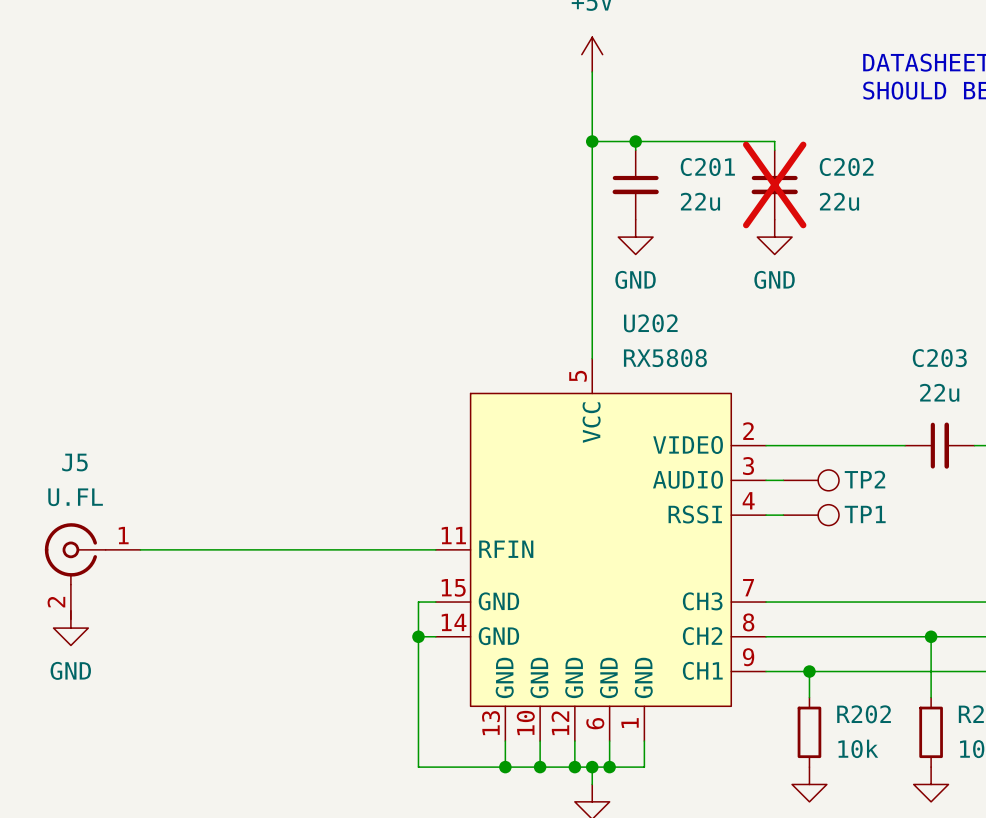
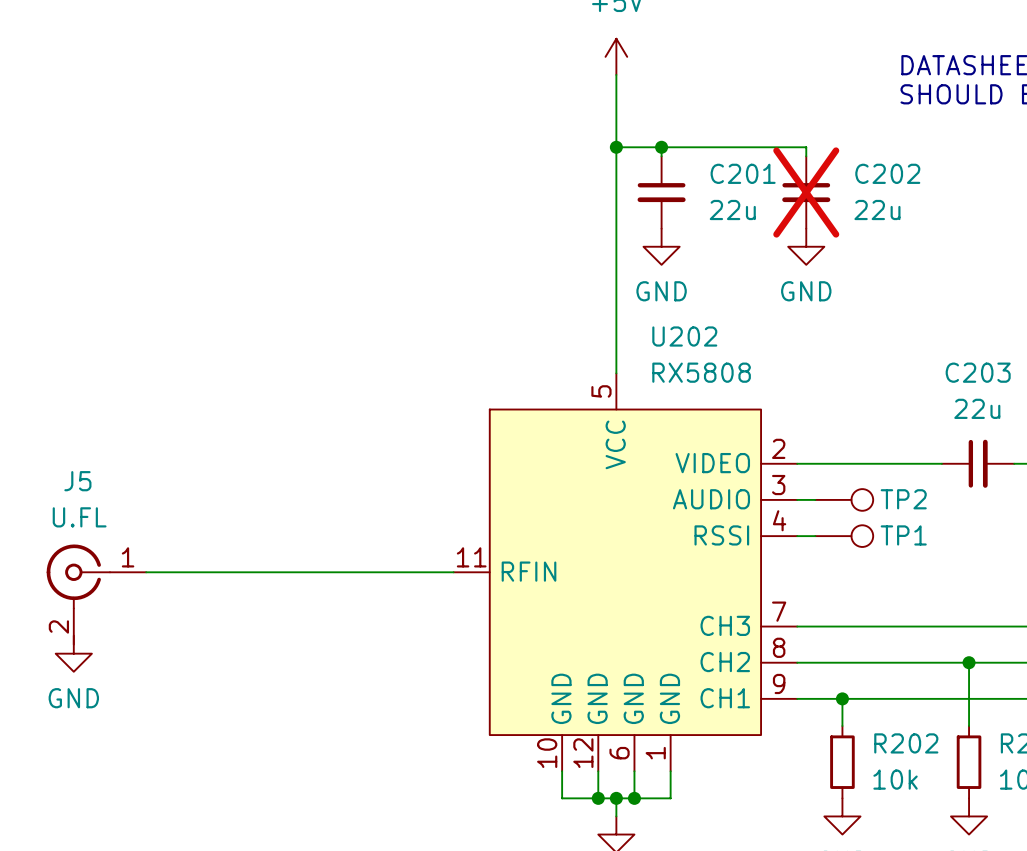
U202 symbol: [435, 358, 767, 742] -> [453, 373, 798, 772]
wire: (435, 602) (418, 602) (418, 767) (540, 767) -> none
wire: (418, 636) (435, 636) -> none
junction: (418, 636) -> none
wire: (505, 741) (505, 767) -> none
junction: (505, 767) -> none
junction: (540, 767) -> none

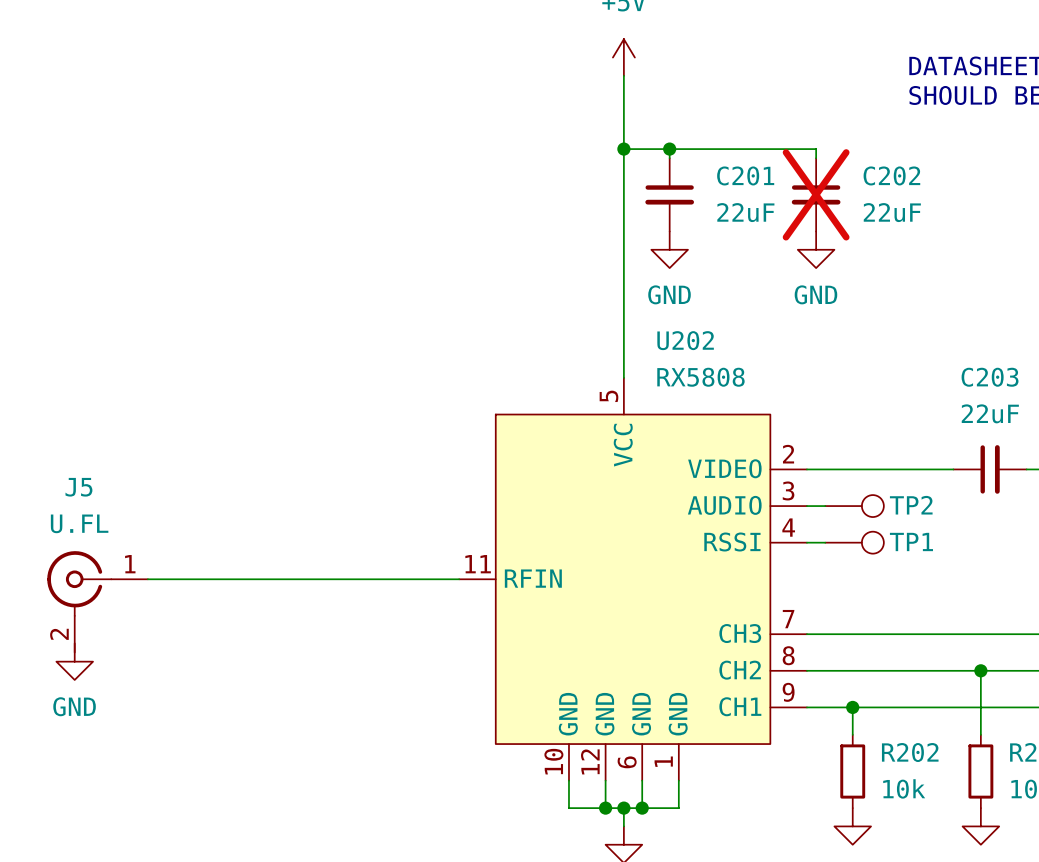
C201 value: 22u (732, 209) -> 22uF (745, 212)
C202 value: 22u (877, 209) -> 22uF (892, 212)
C203 value: 22u (977, 408) -> 22uF (990, 413)

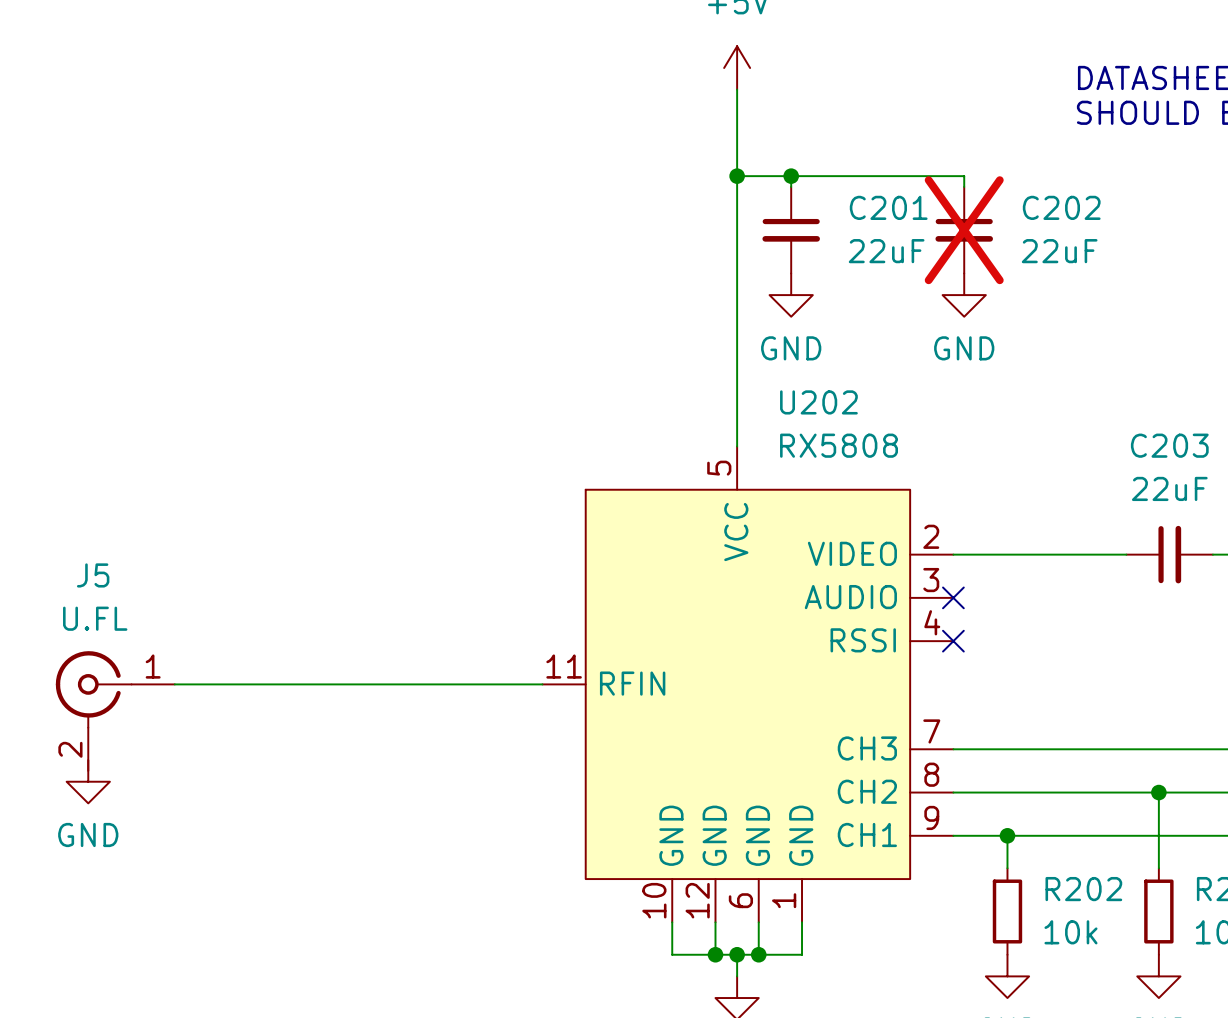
wire: (806, 506) (825, 506) -> none
no-connect mark: none -> (953, 597)
TP2: (854, 506) -> none
wire: (806, 542) (825, 542) -> none
no-connect mark: none -> (953, 641)
TP1: (854, 542) -> none

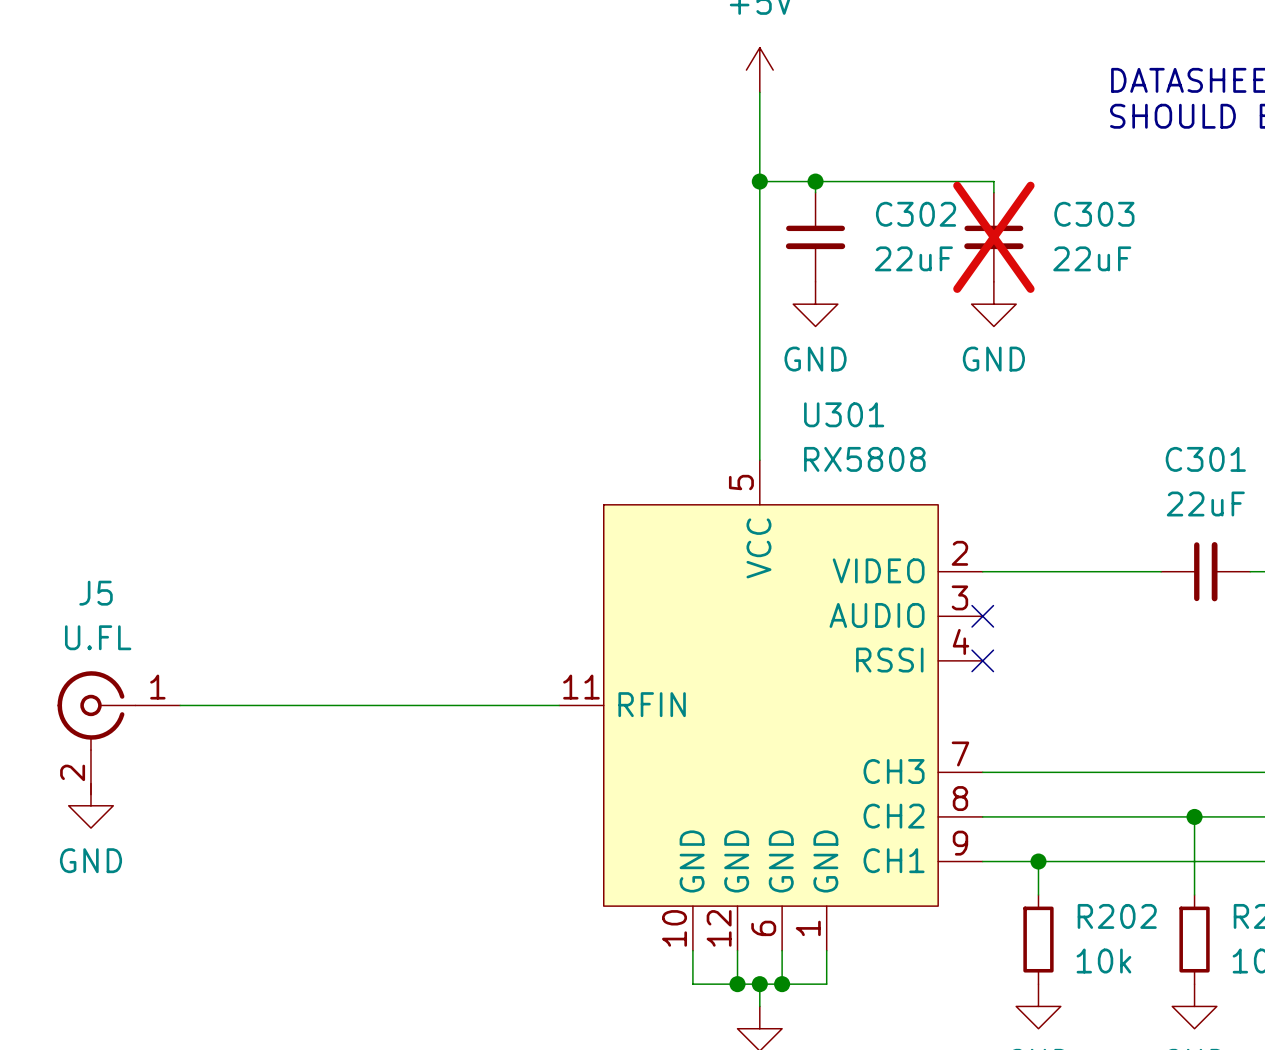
C201 name: C201 (888, 207) -> C302 (916, 214)
C202 name: C202 (1061, 207) -> C303 (1094, 214)
U202 name: U202 (818, 402) -> U301 (844, 414)
C203 name: C203 (1169, 445) -> C301 (1205, 459)

